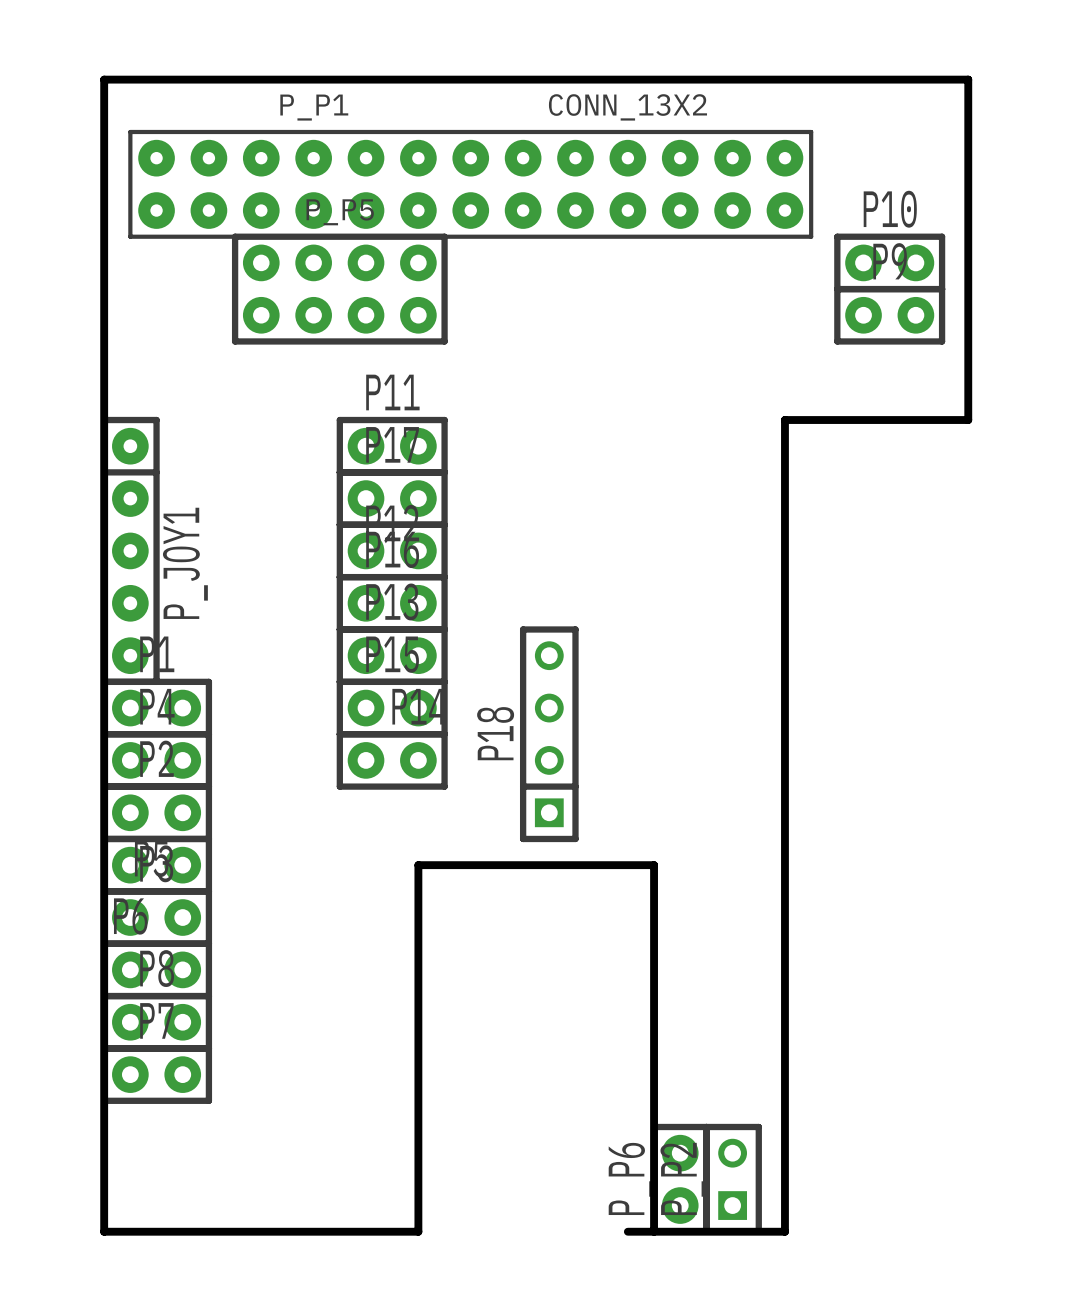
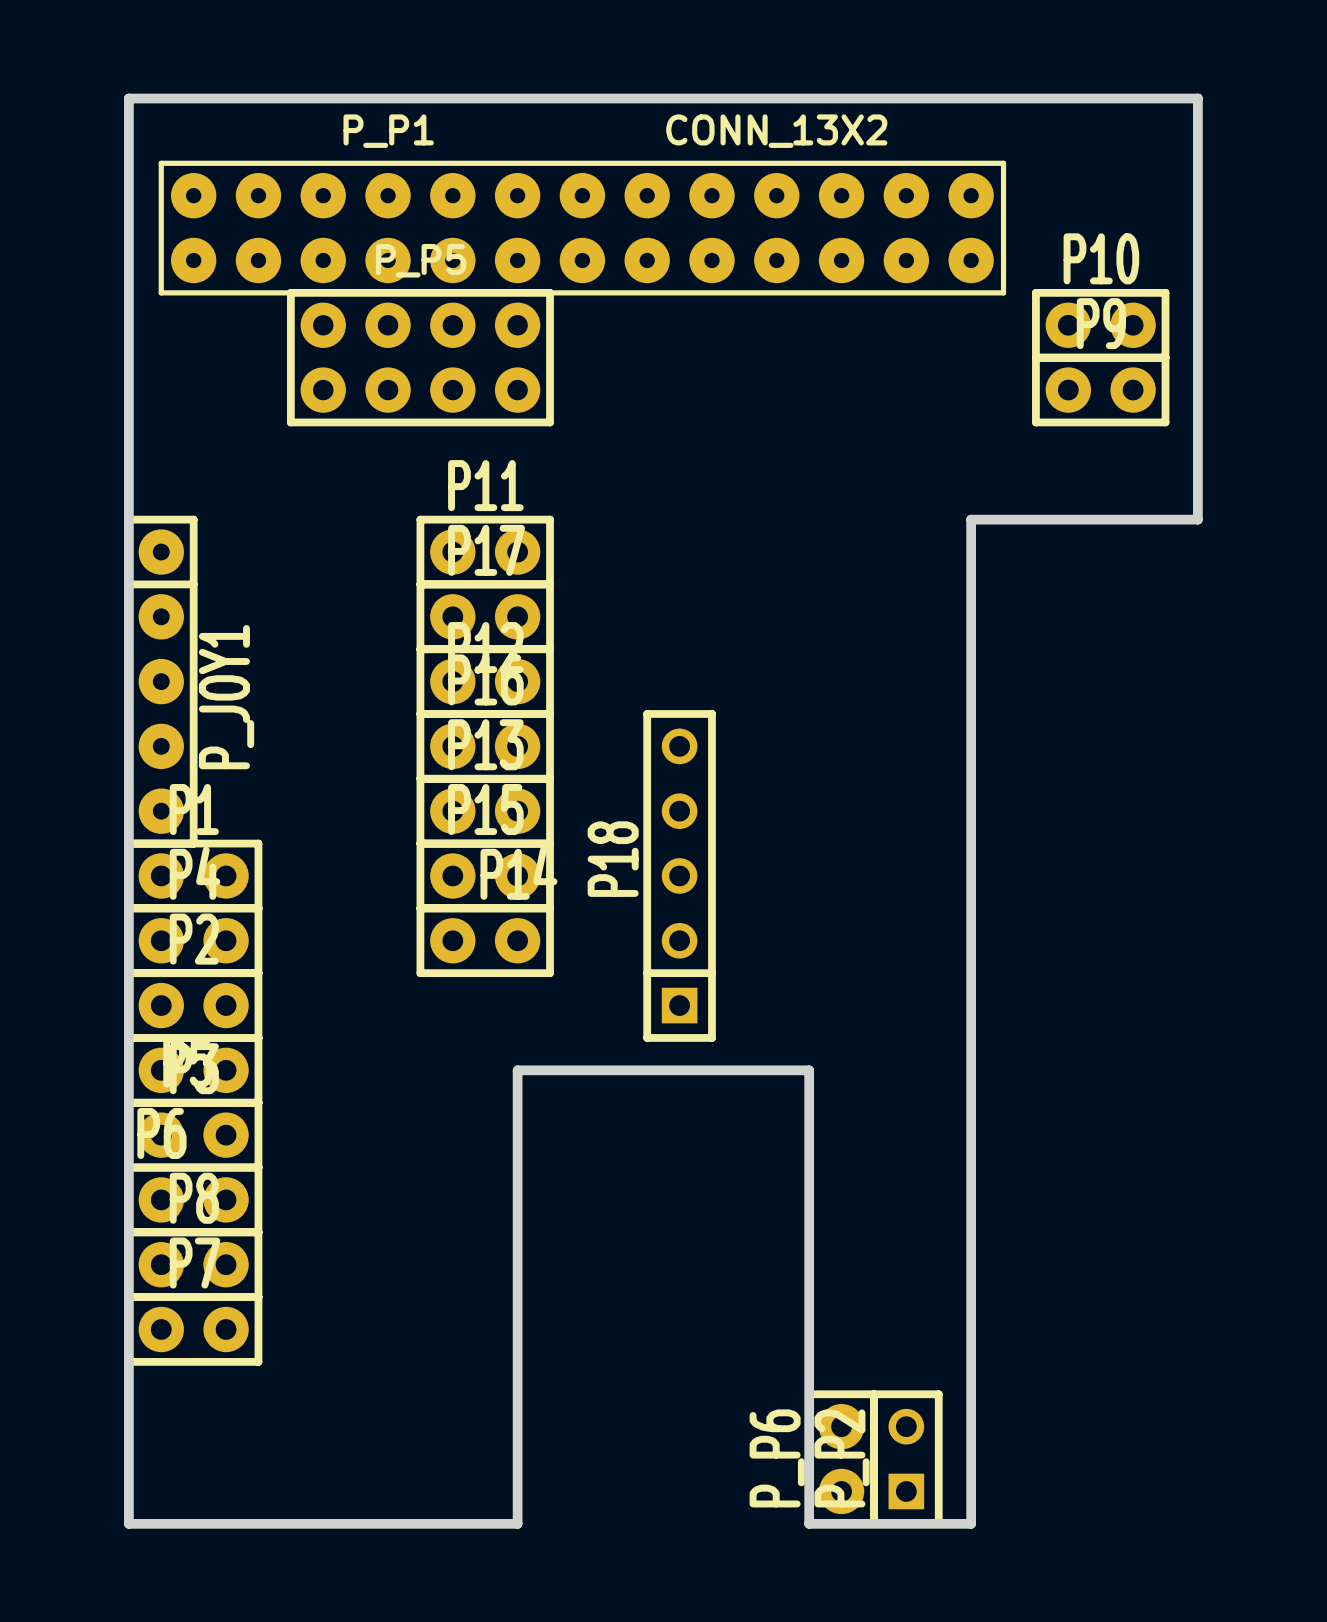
P18 footprint: [519, 626, 579, 843] -> [643, 710, 716, 1042]
board edge: (627, 1231) (654, 1231) -> none

